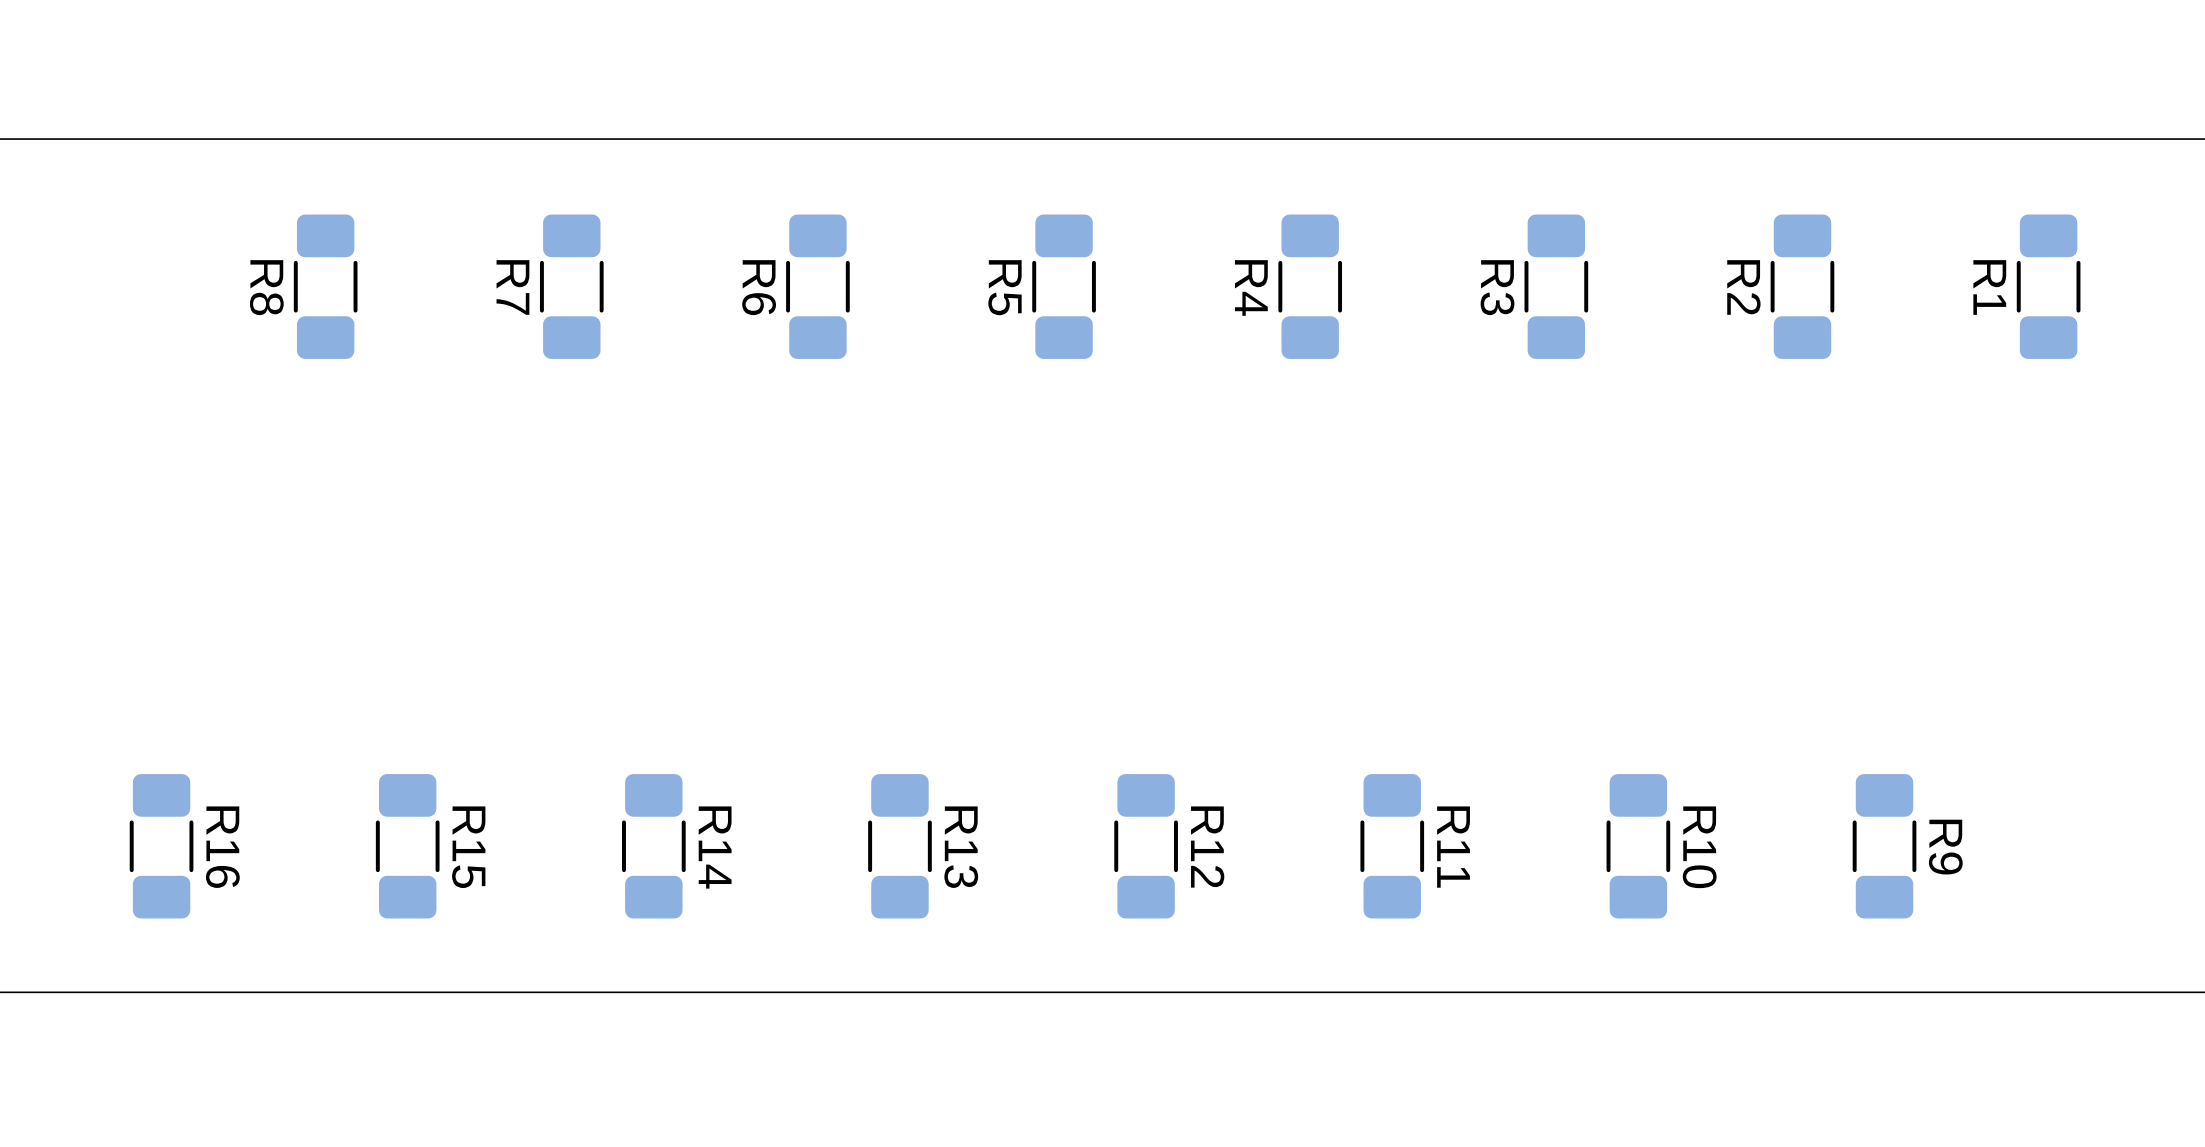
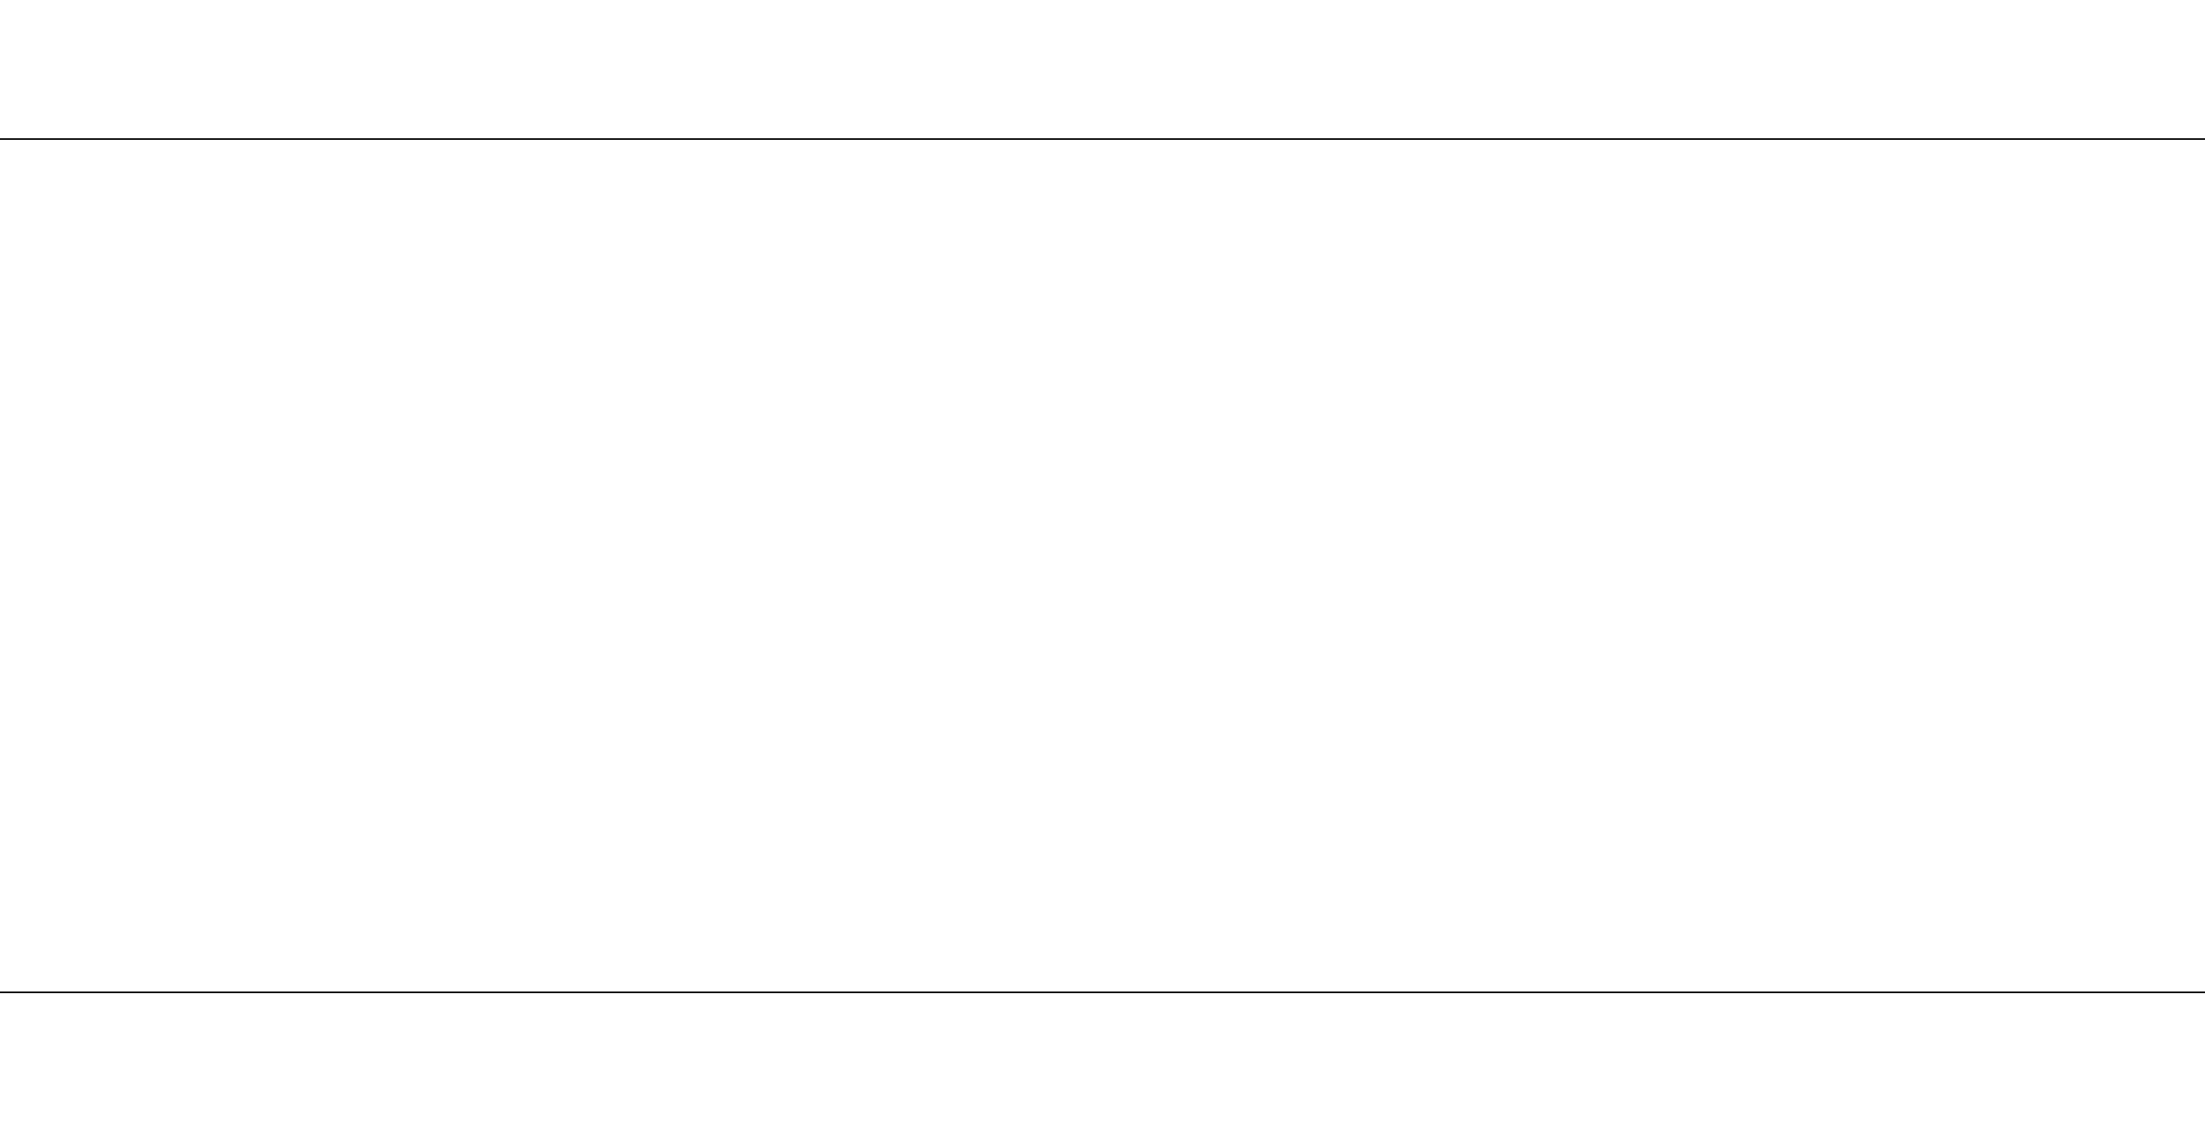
R8: (325, 286) -> none
R7: (571, 286) -> none
R6: (817, 286) -> none
R5: (1064, 286) -> none
R4: (1310, 286) -> none
R3: (1556, 286) -> none
R2: (1802, 286) -> none
R1: (2048, 286) -> none
R16: (161, 846) -> none
R15: (407, 846) -> none
R14: (653, 846) -> none
R13: (899, 846) -> none
R12: (1146, 846) -> none
R11: (1392, 846) -> none
R10: (1638, 846) -> none
R9: (1884, 846) -> none

